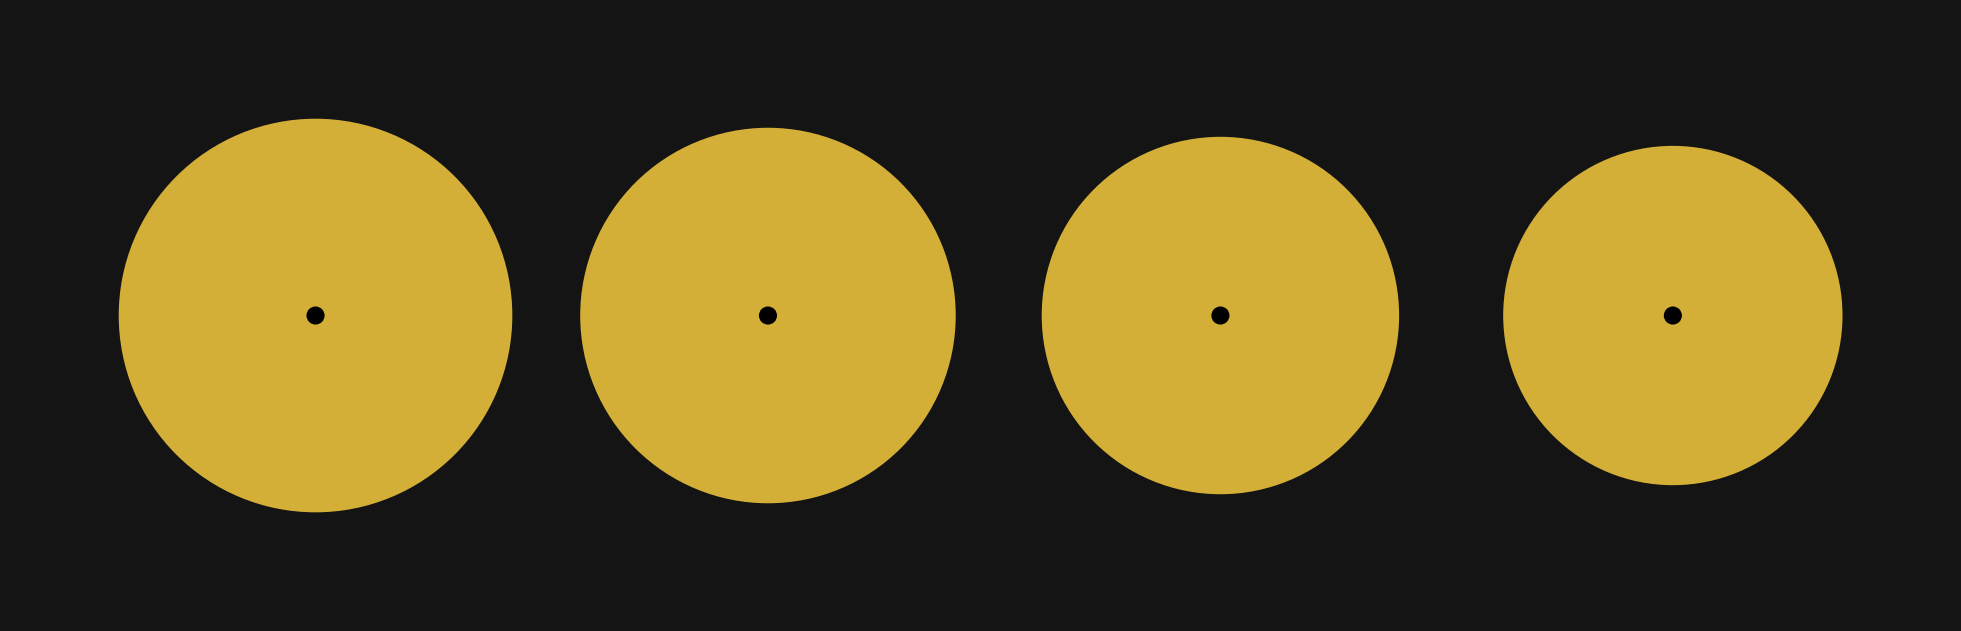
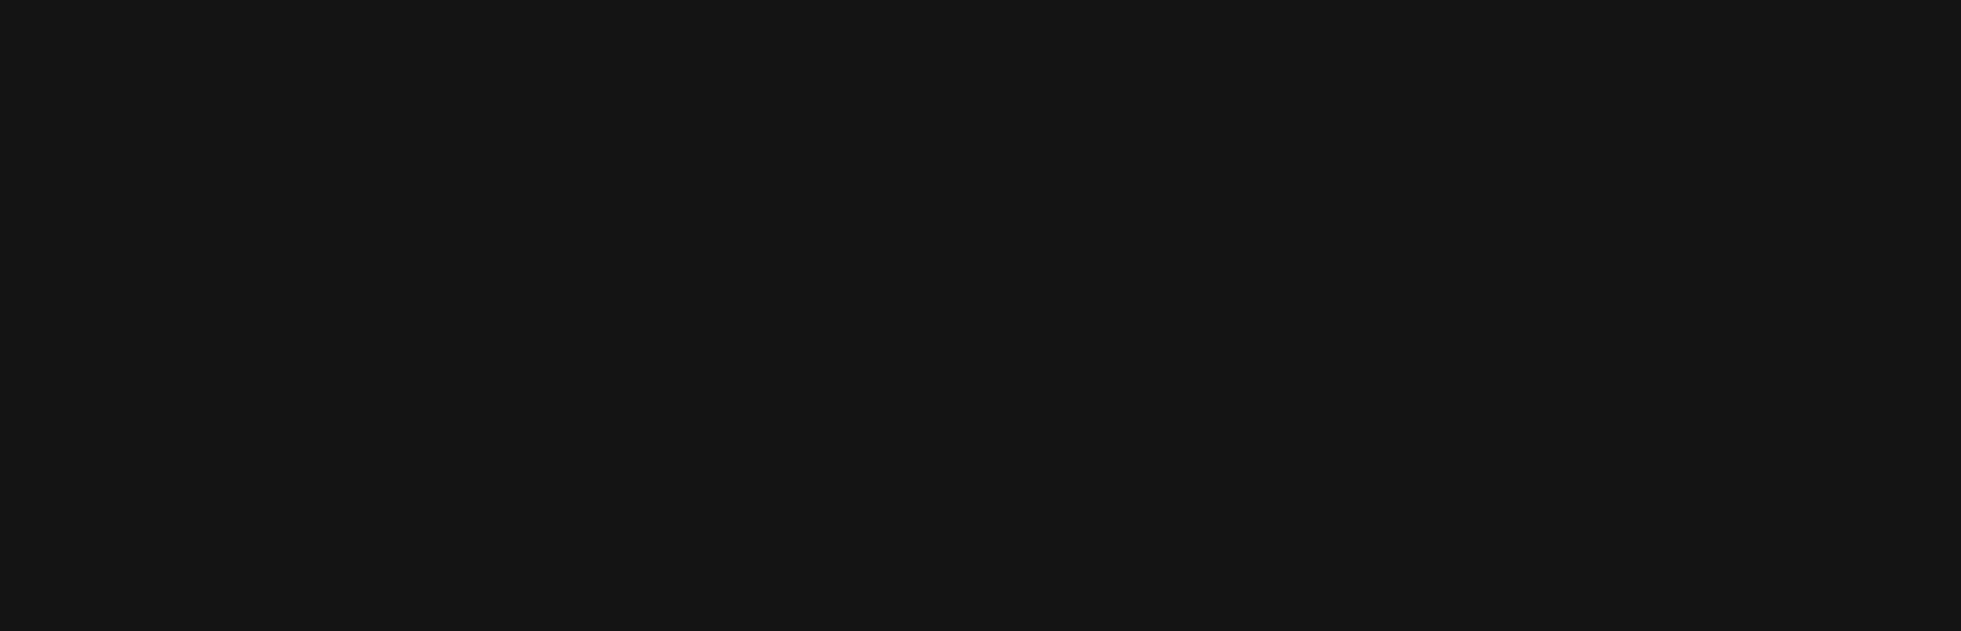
part: (315, 315) -> none
part: (767, 315) -> none
part: (1220, 315) -> none
part: (1672, 315) -> none

